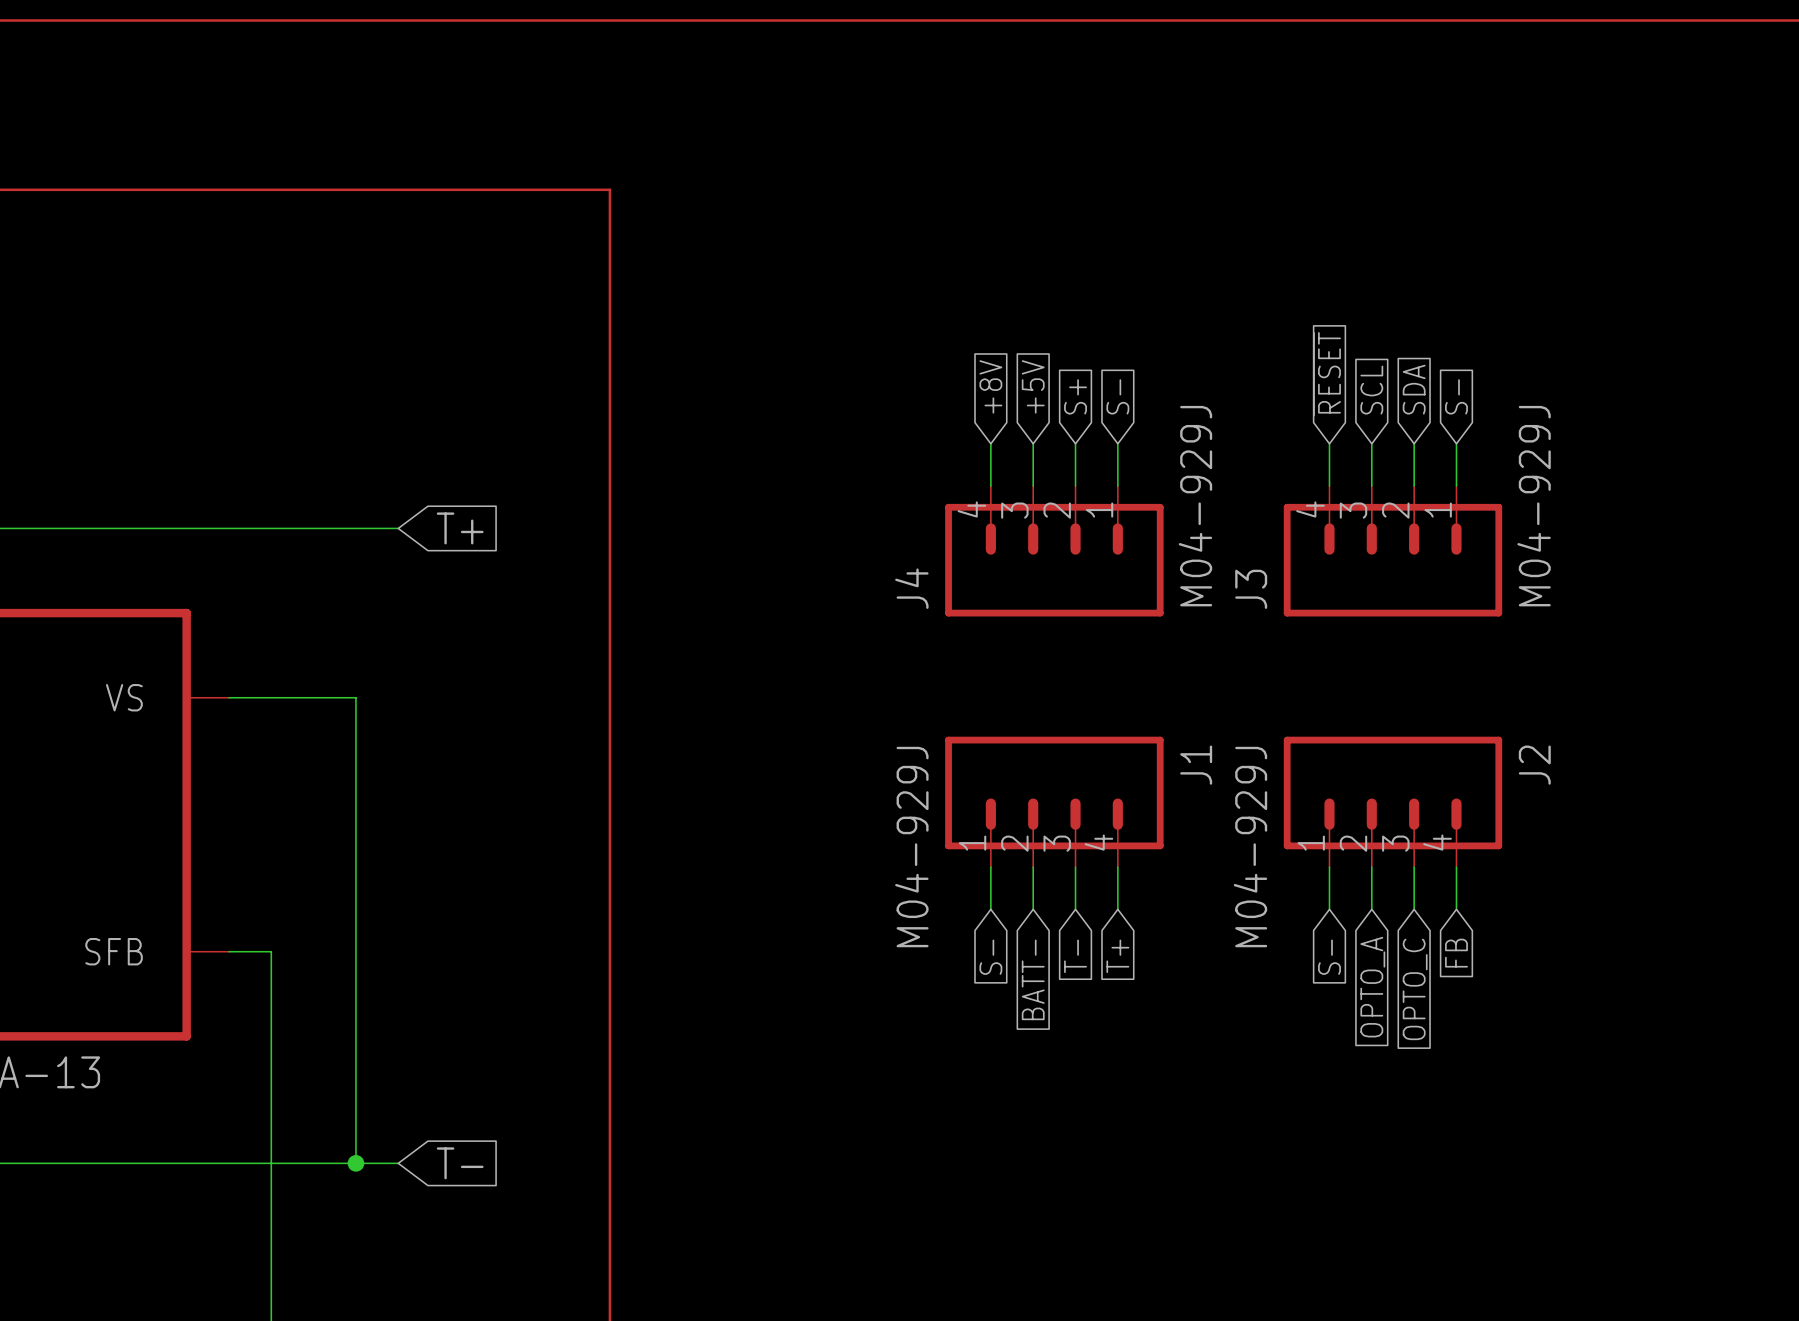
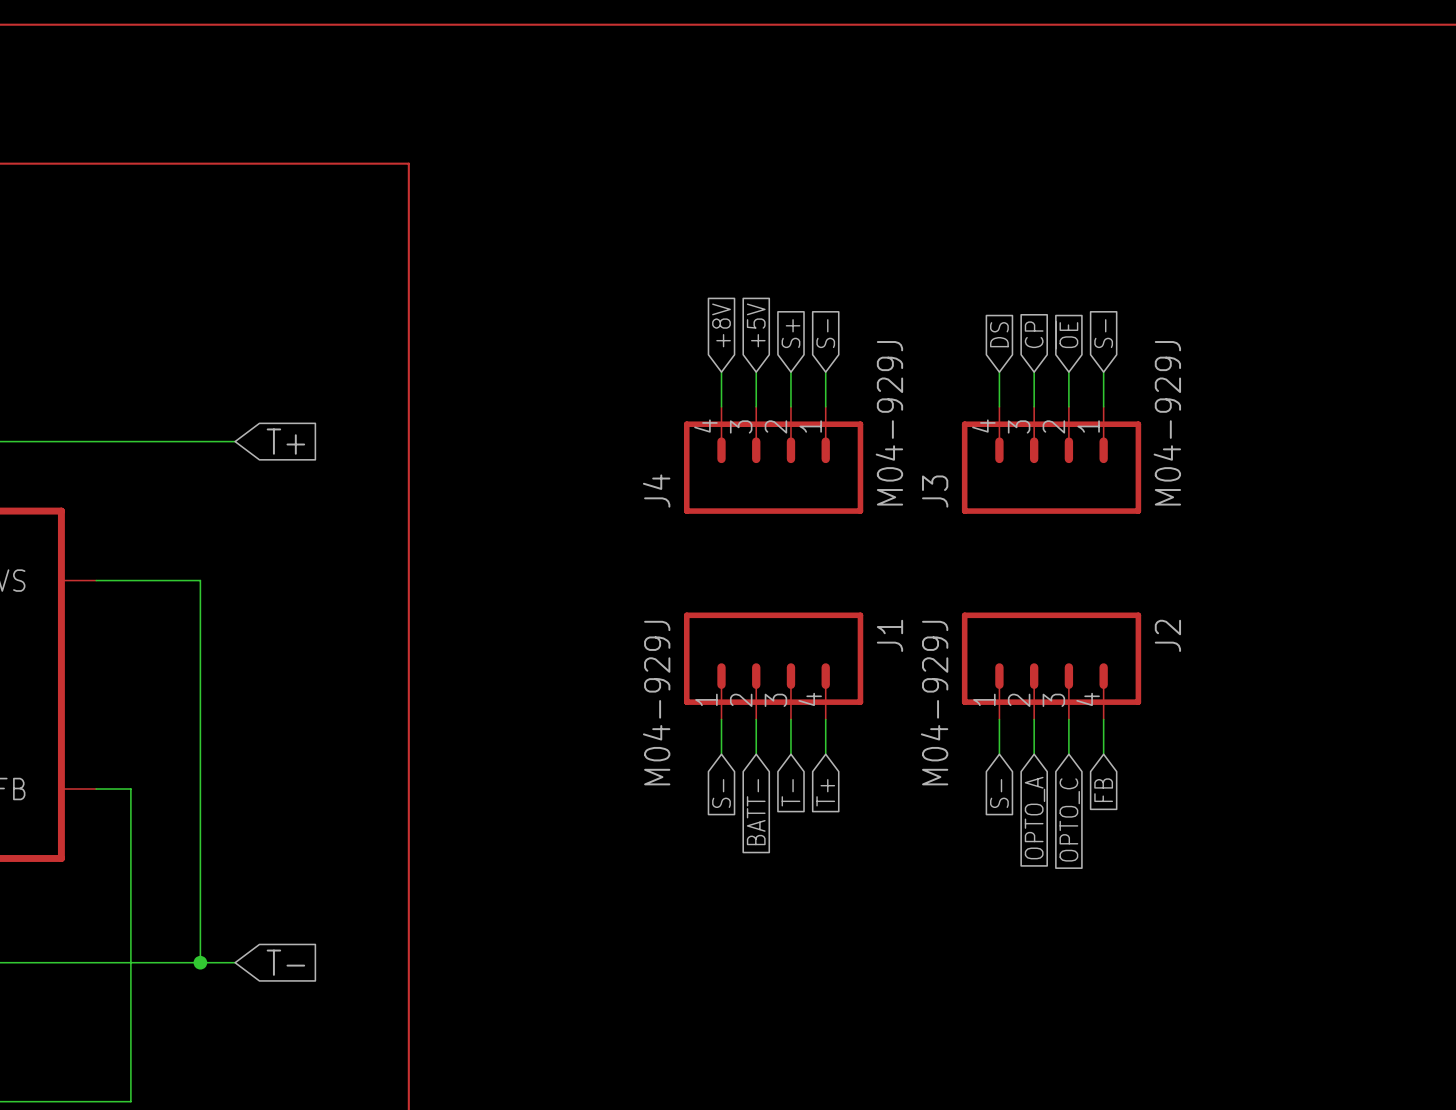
global label: ~{RESET} (1327, 374) -> DS (999, 334)
global label: SDA (1414, 389) -> ~{OE} (1066, 335)
global label: SCL (1371, 390) -> CP (1034, 334)

